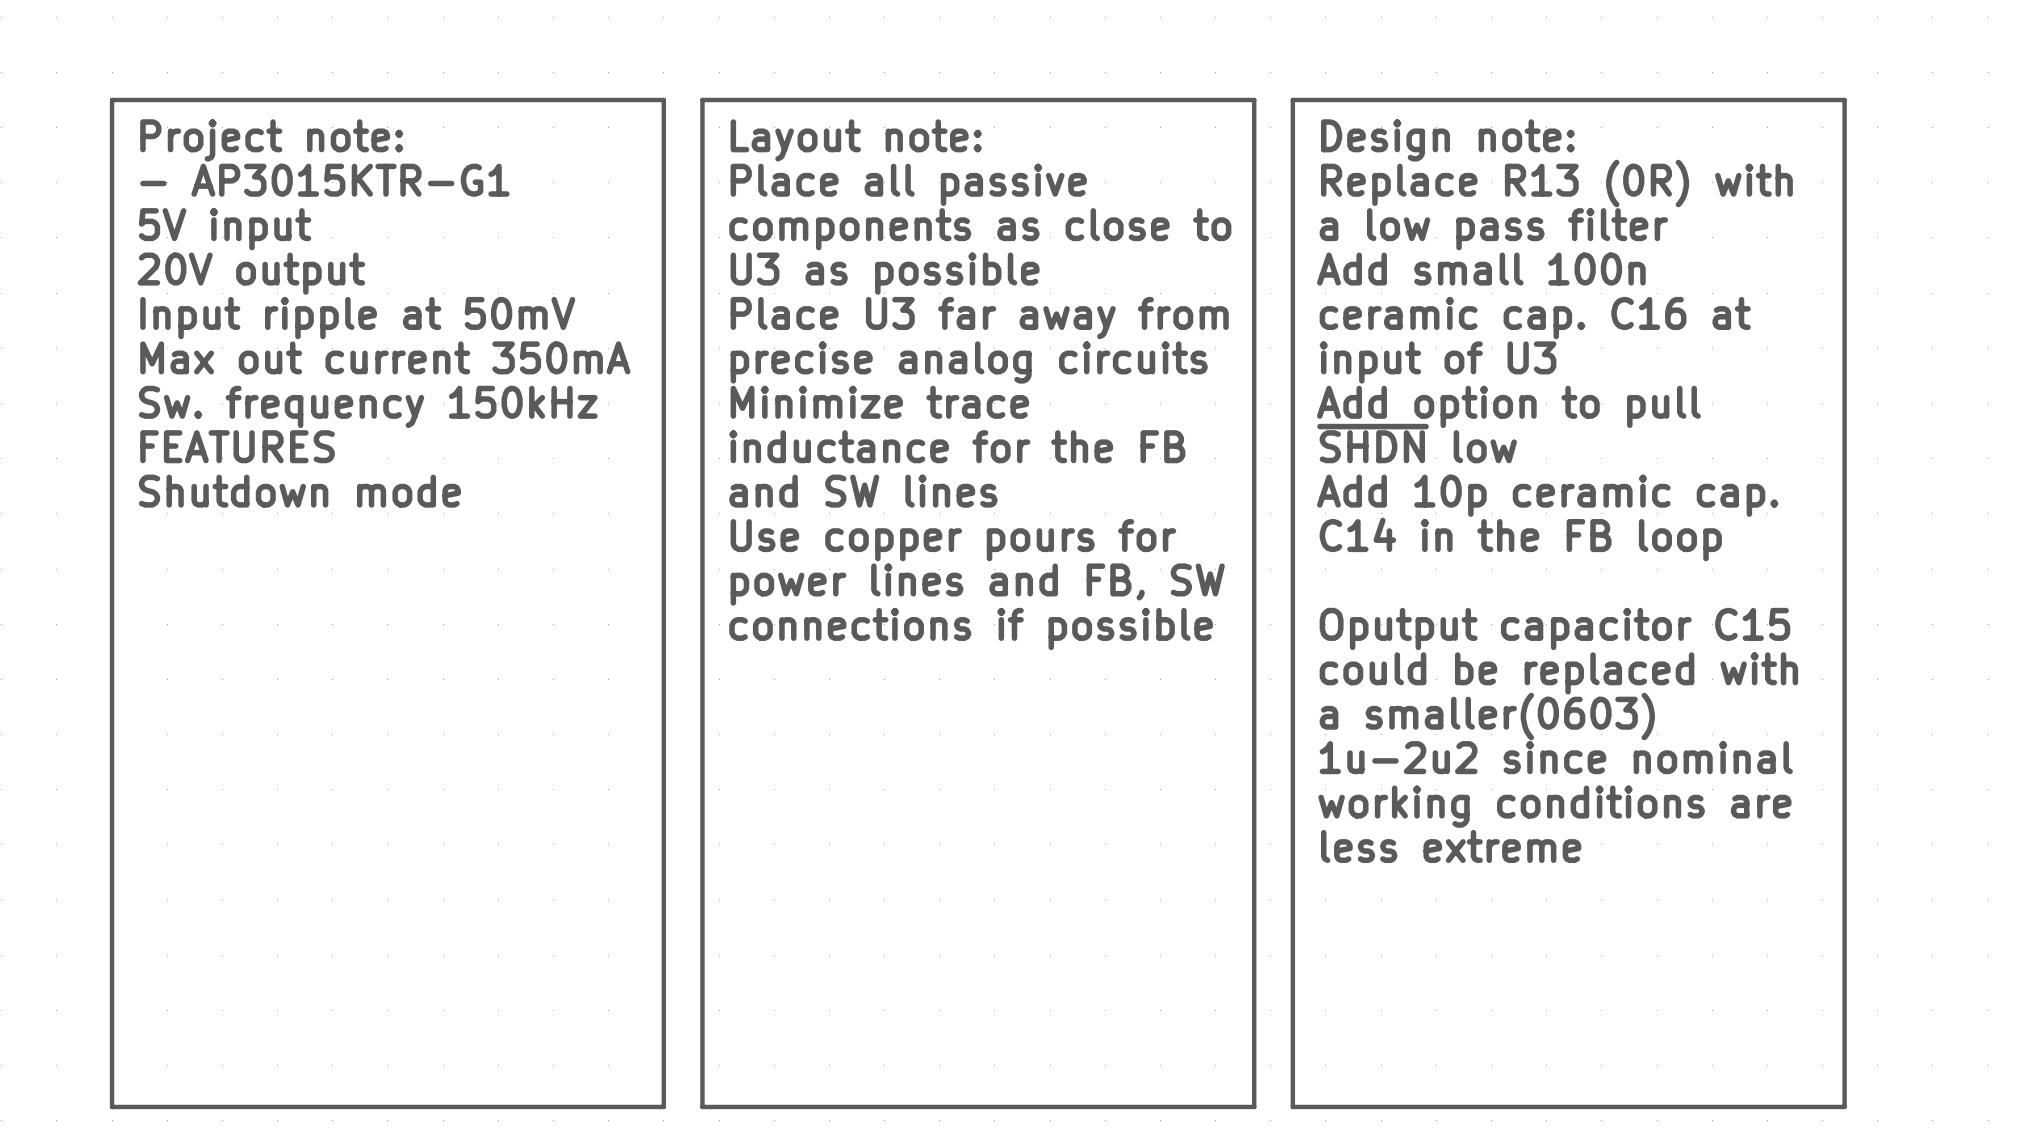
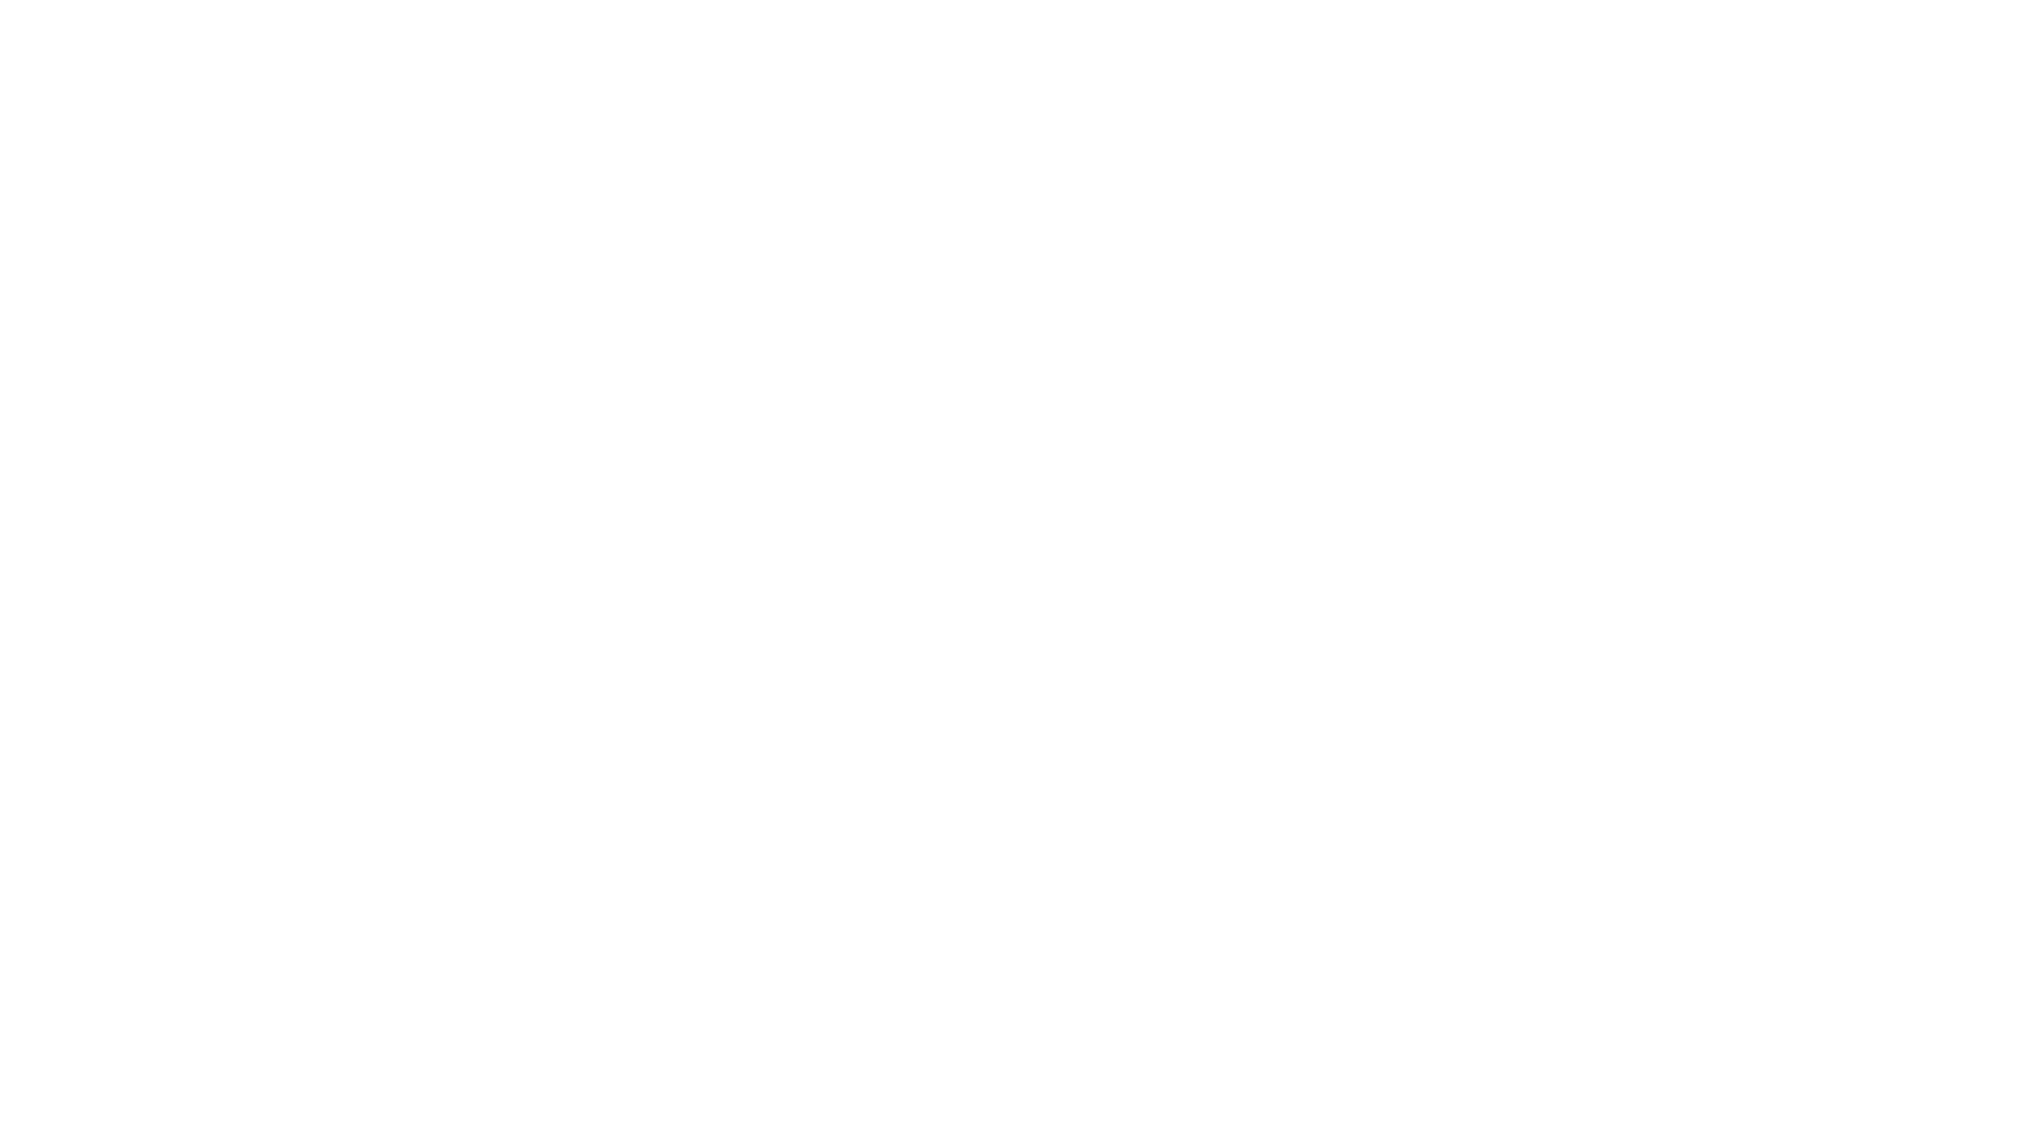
line: (112, 100) (663, 100) (663, 1106) (112, 1106) (112, 100) -> none
line: (702, 100) (1254, 100) (1254, 1106) (702, 1106) (702, 100) -> none
line: (1292, 100) (1844, 100) (1844, 1106) (1292, 1106) (1292, 100) -> none
text: Project note: (271, 140) -> none
text: Layout note: (856, 140) -> none
text: Design note: (1447, 140) -> none
text: - AP3015KTR-G1 (324, 180) -> none
text: Replace R13 (0R) with (1556, 183) -> none
text: Place all passive (908, 184) -> none
text: 5V input (225, 229) -> none
text: components as close to (980, 229) -> none
text: a low pass filter (1493, 229) -> none
text: Add small 100n (1481, 269) -> none
text: 20V output (251, 273) -> none
text: U3 as possible (885, 273) -> none
text: Input ripple at 50mV (357, 318) -> none
text: Place U3 far away from (979, 318) -> none
text: ceramic cap. C16 at (1535, 318) -> none
text: Max out current 350mA (385, 357) -> none
text: precise analog circuits (969, 362) -> none
text: input of U3 (1438, 362) -> none
text: Minimize trace (879, 402) -> none
text: Sw. frequency 150kHz (368, 406) -> none
text: Add option to pull (1508, 406) -> none
text: ~{SHDN} low (1417, 443) -> none
text: FEATURES (237, 446) -> none
text: inductance for the FB (957, 446) -> none
text: Shutdown mode (299, 491) -> none
text: and SW lines (863, 491) -> none
text: Add 10p ceramic cap. (1547, 495) -> none
text: C14 in the FB loop (1520, 539) -> none
text: Use copper pours for (953, 540) -> none
text: power lines and FB, SW (977, 584) -> none
text: connections if possible (971, 628) -> none
text: Oputput capacitor C15 (1554, 628) -> none
text: could be replaced with (1558, 673) -> none
text: a smaller(0603) (1487, 716) -> none
text: 1u-2u2 since nominal (1556, 757) -> none
text: working conditions are (1554, 806) -> none
text: less extreme (1451, 846) -> none

